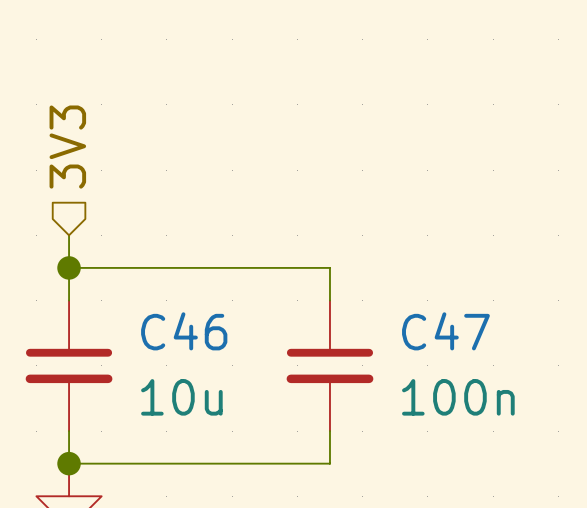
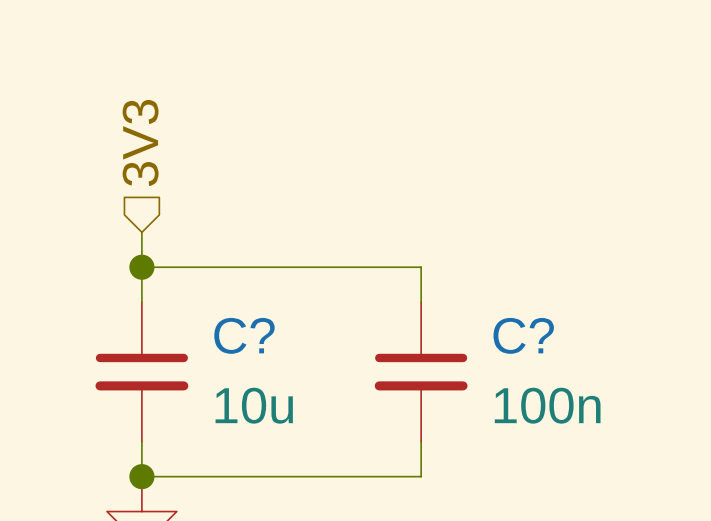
C46 name: C46 (184, 331) -> C? (244, 335)
C47 name: C47 (445, 331) -> C? (523, 335)

